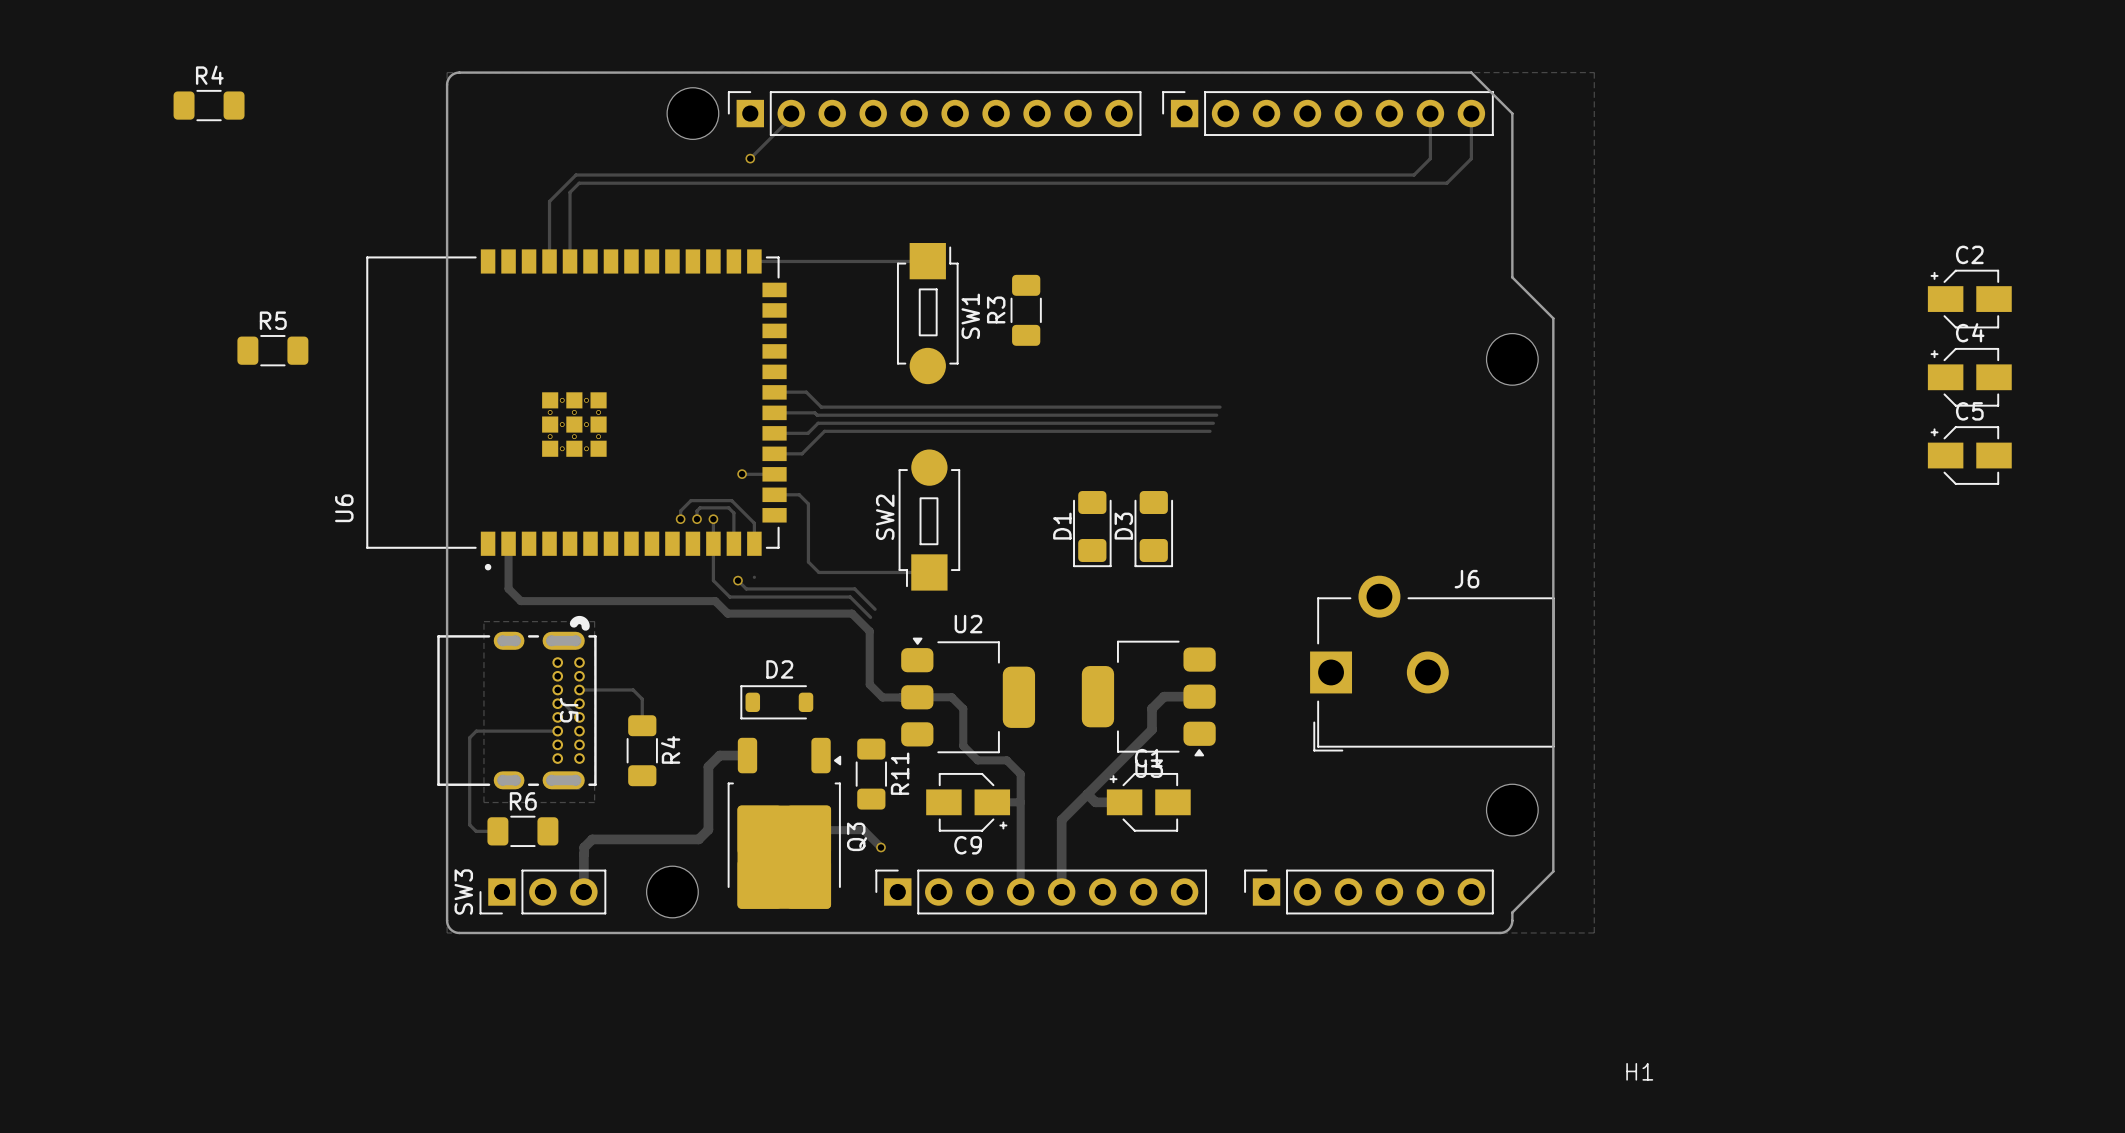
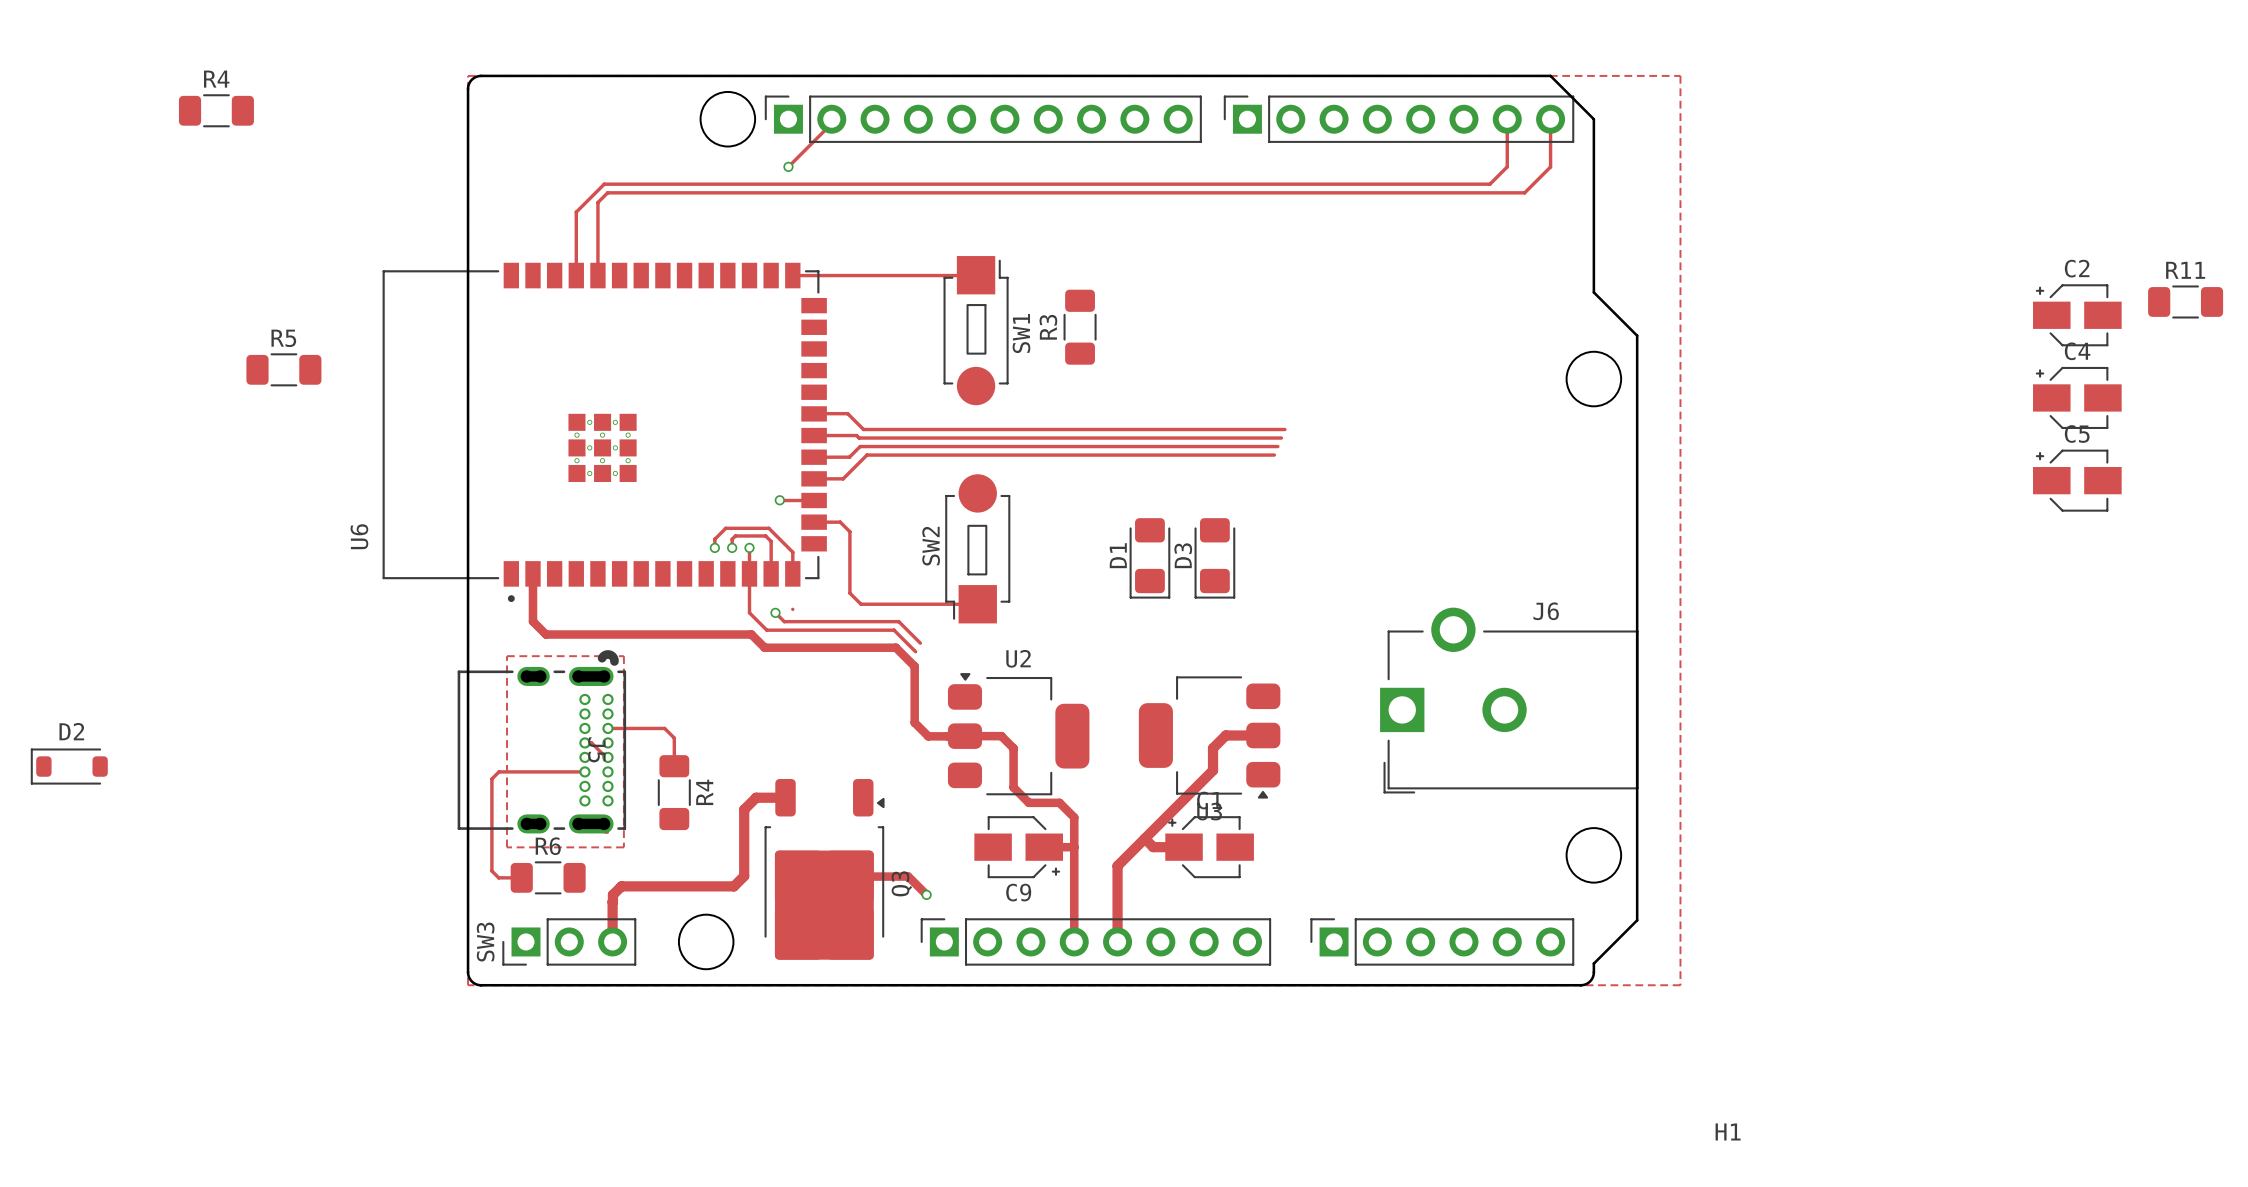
D2 position: (776, 702) -> (69, 766)
R11 name position: R11 (900, 773) -> R11 (2185, 270)
R11 rotation: 0° (871, 774) -> 90° clockwise (2185, 301)
R11 position: (871, 774) -> (2185, 301)

